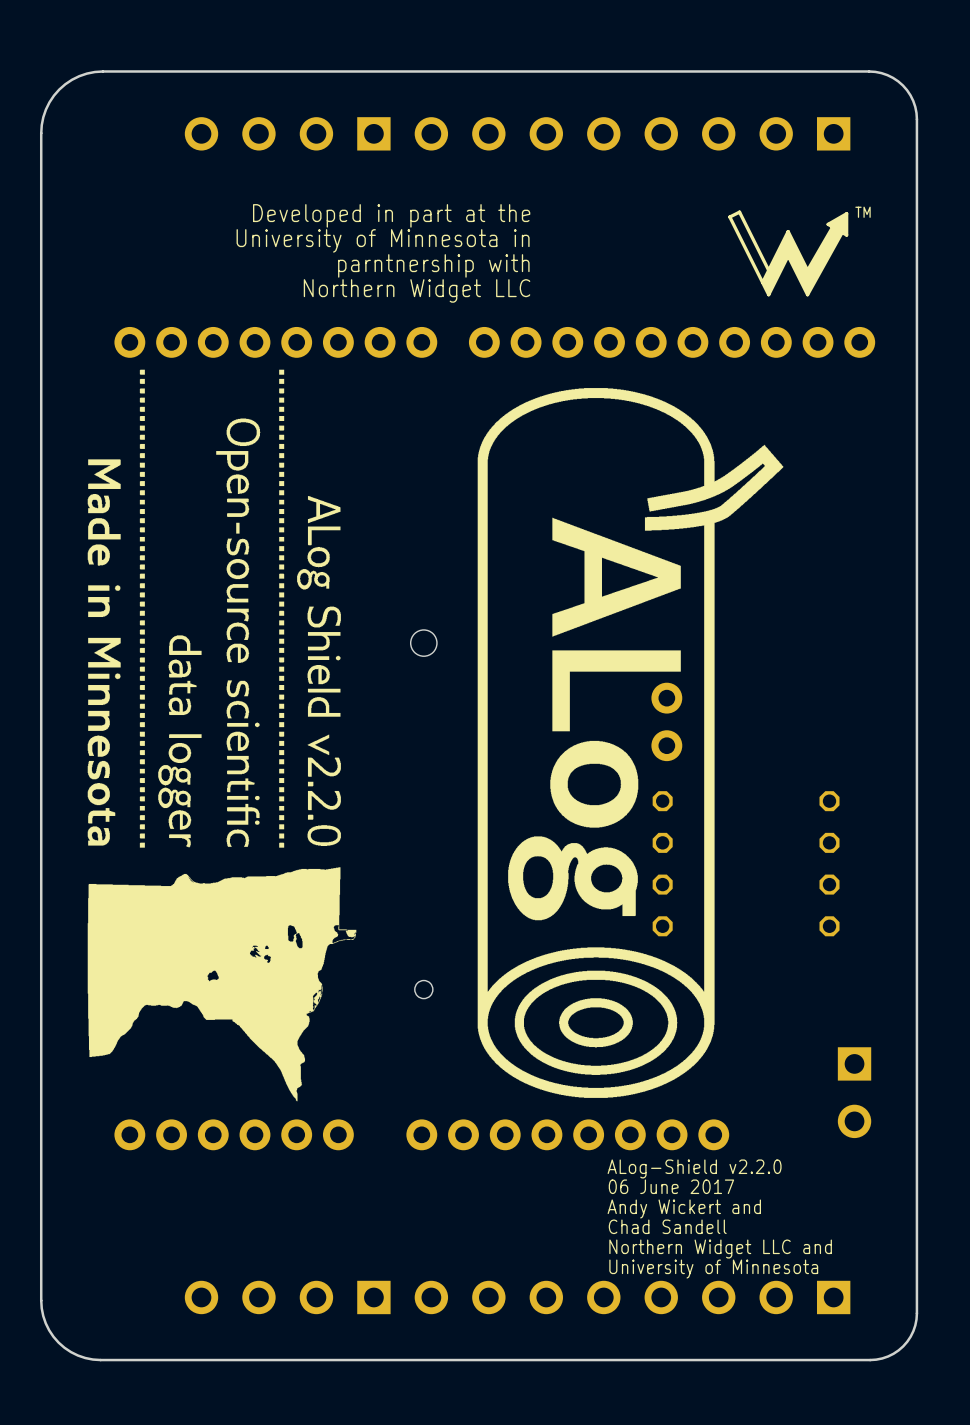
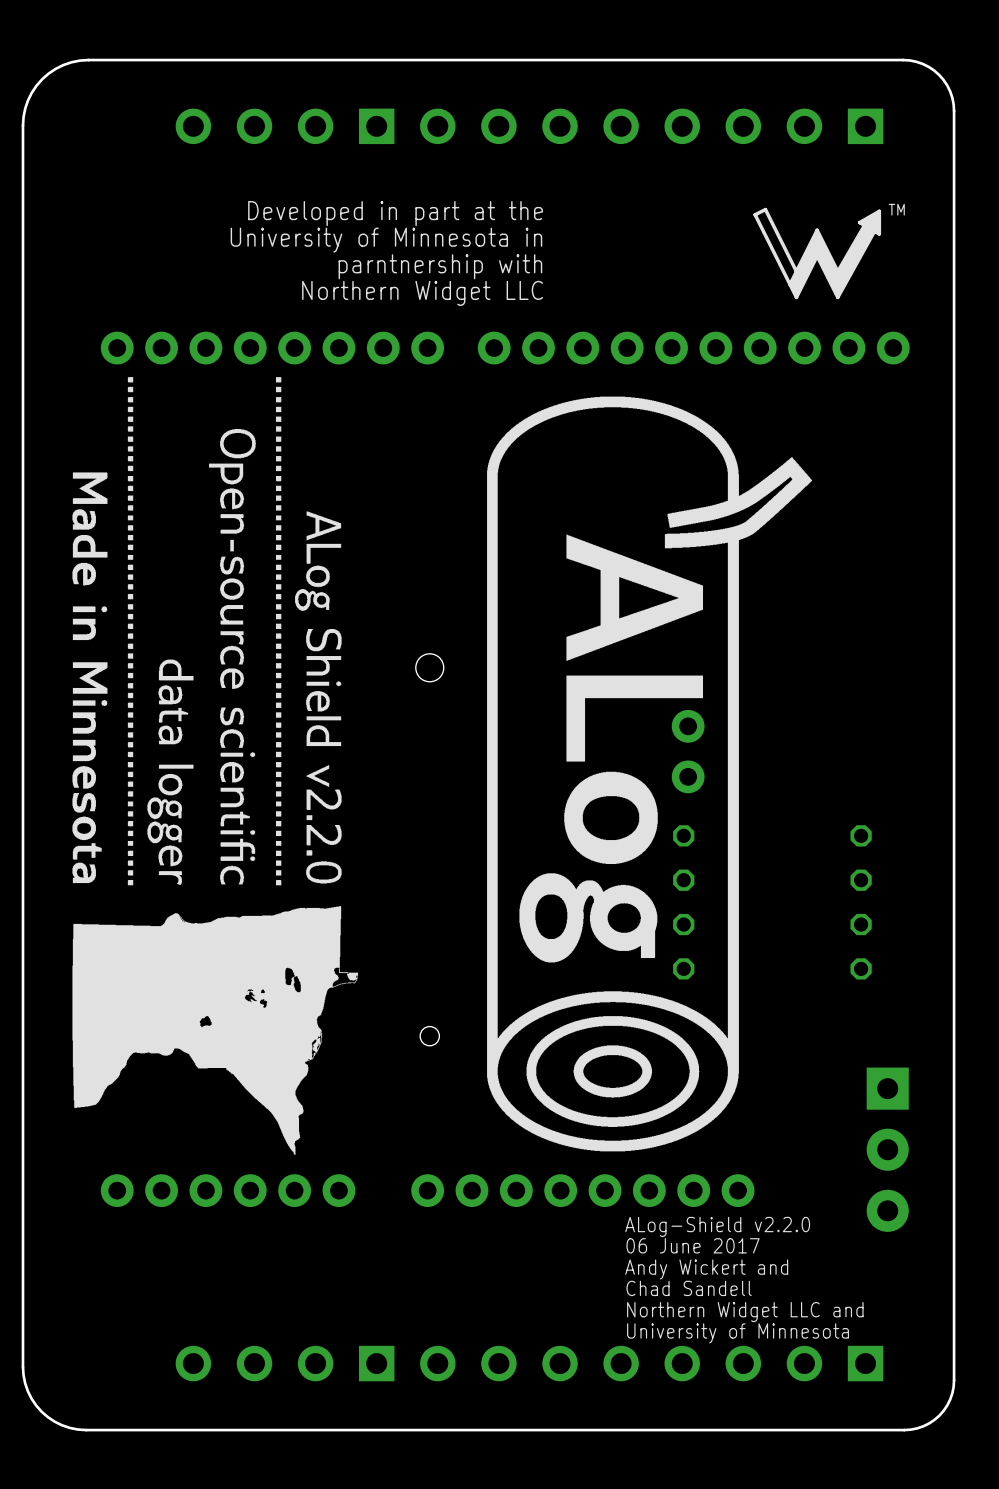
part footprint: [837, 1047, 872, 1139] -> [866, 1067, 909, 1232]

